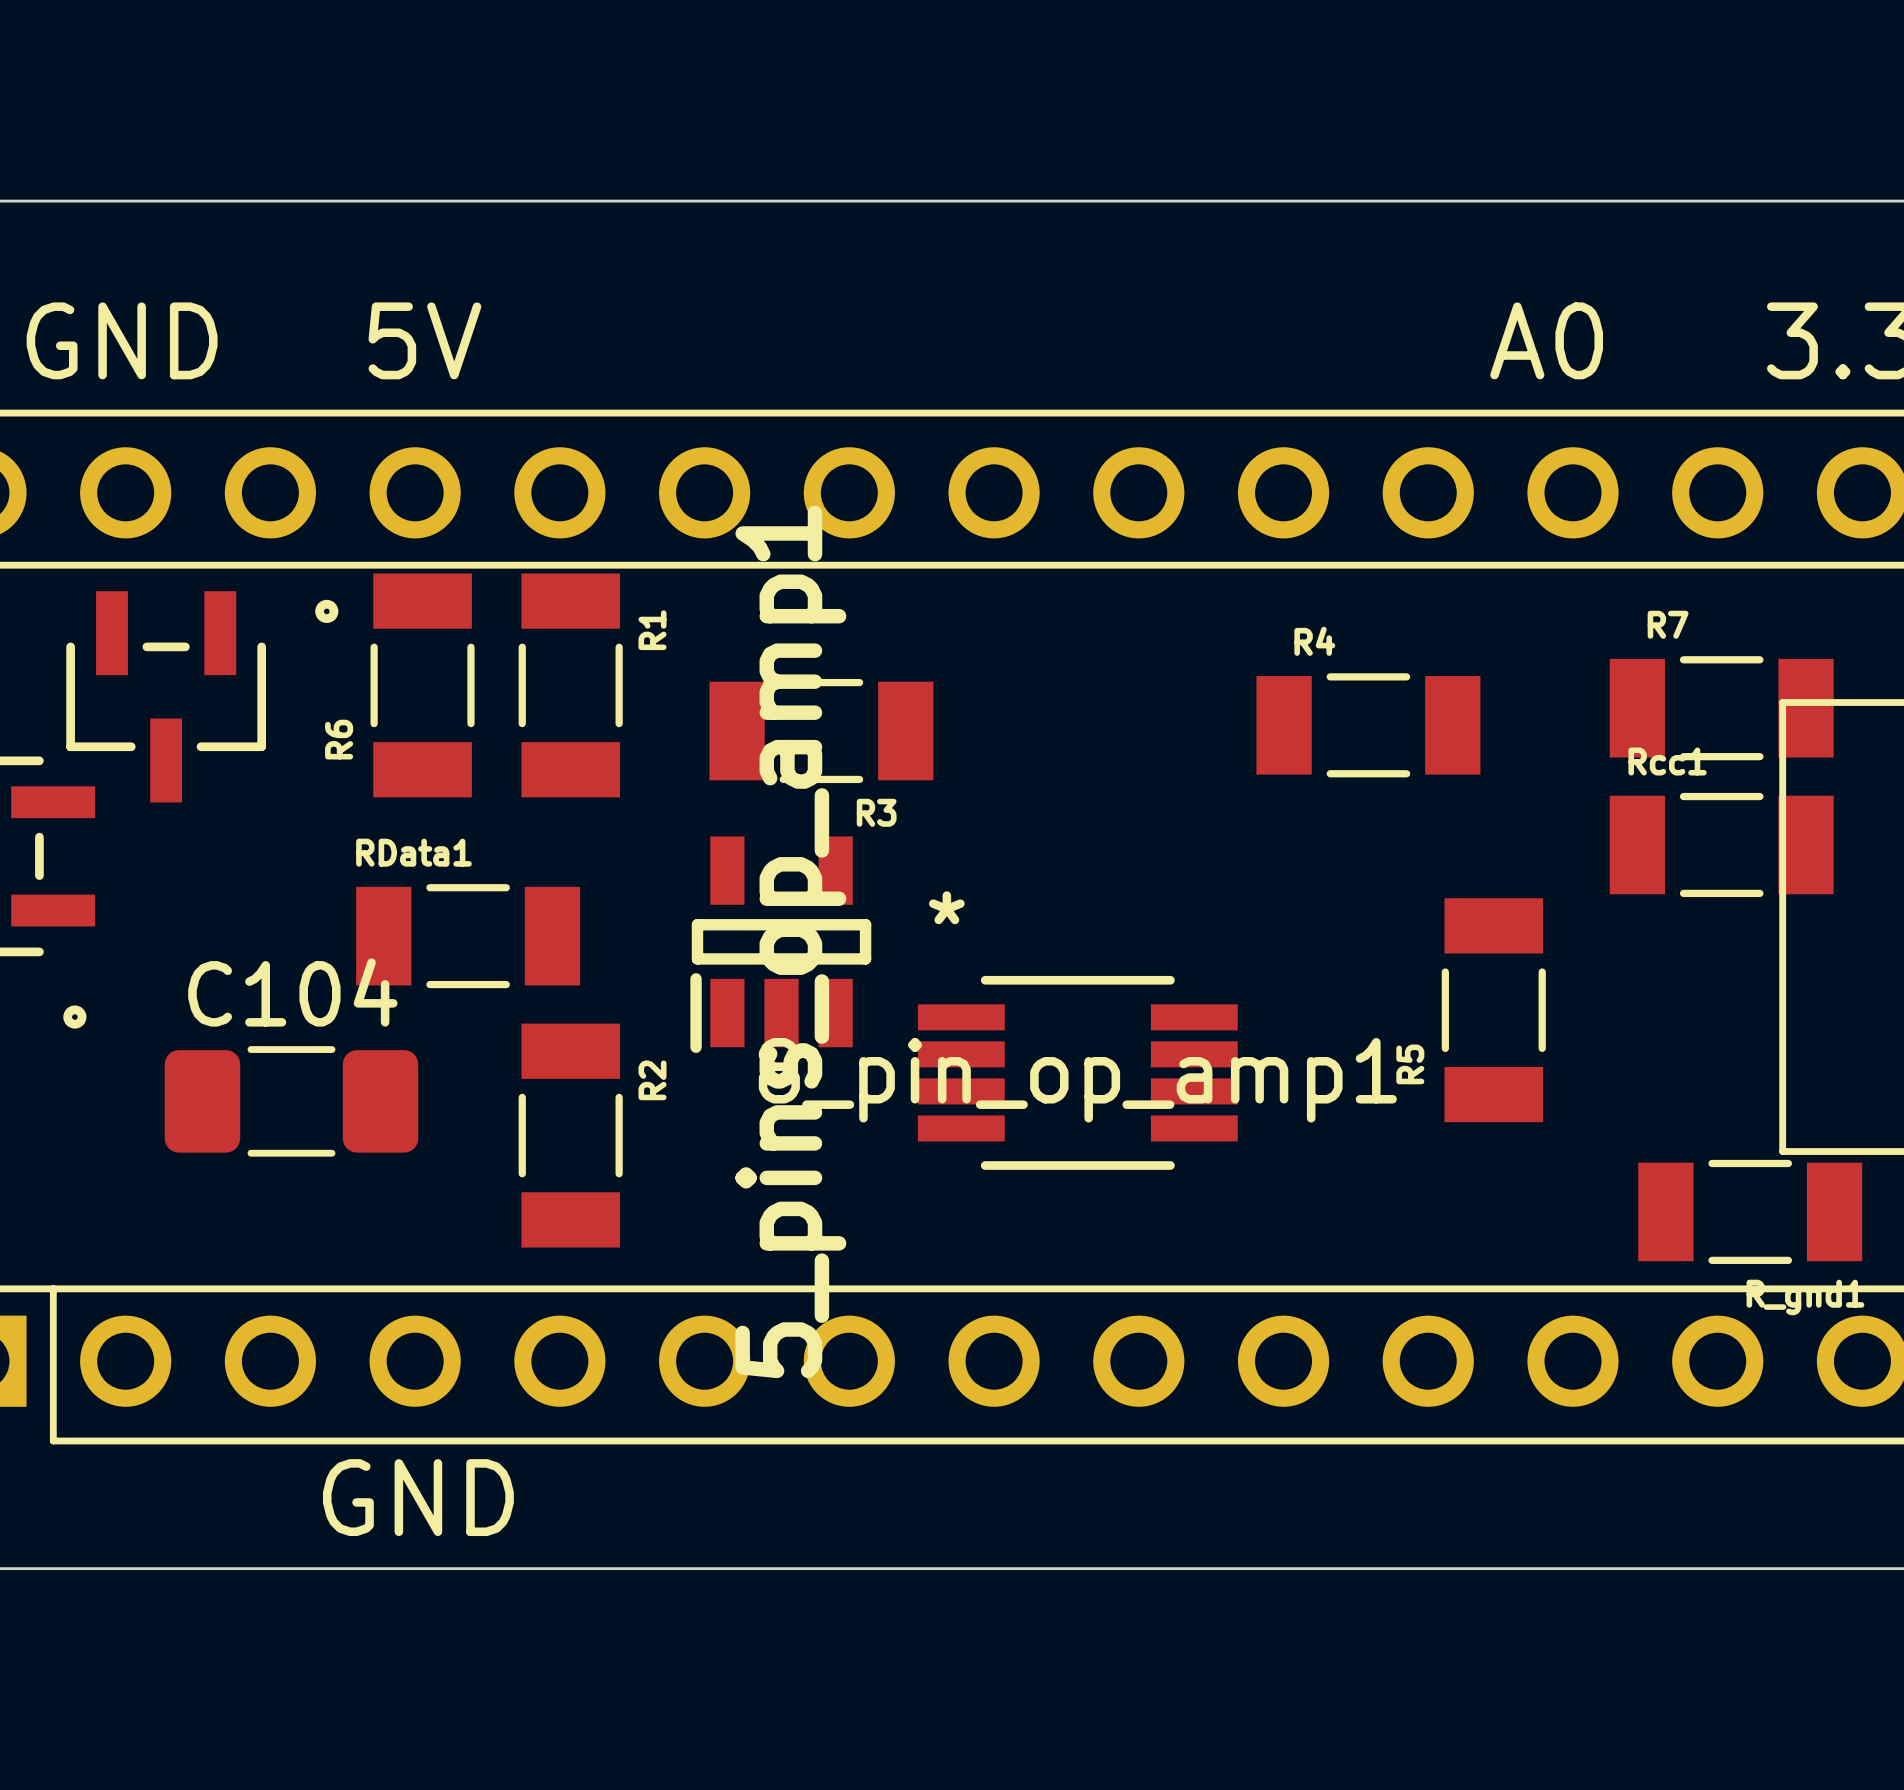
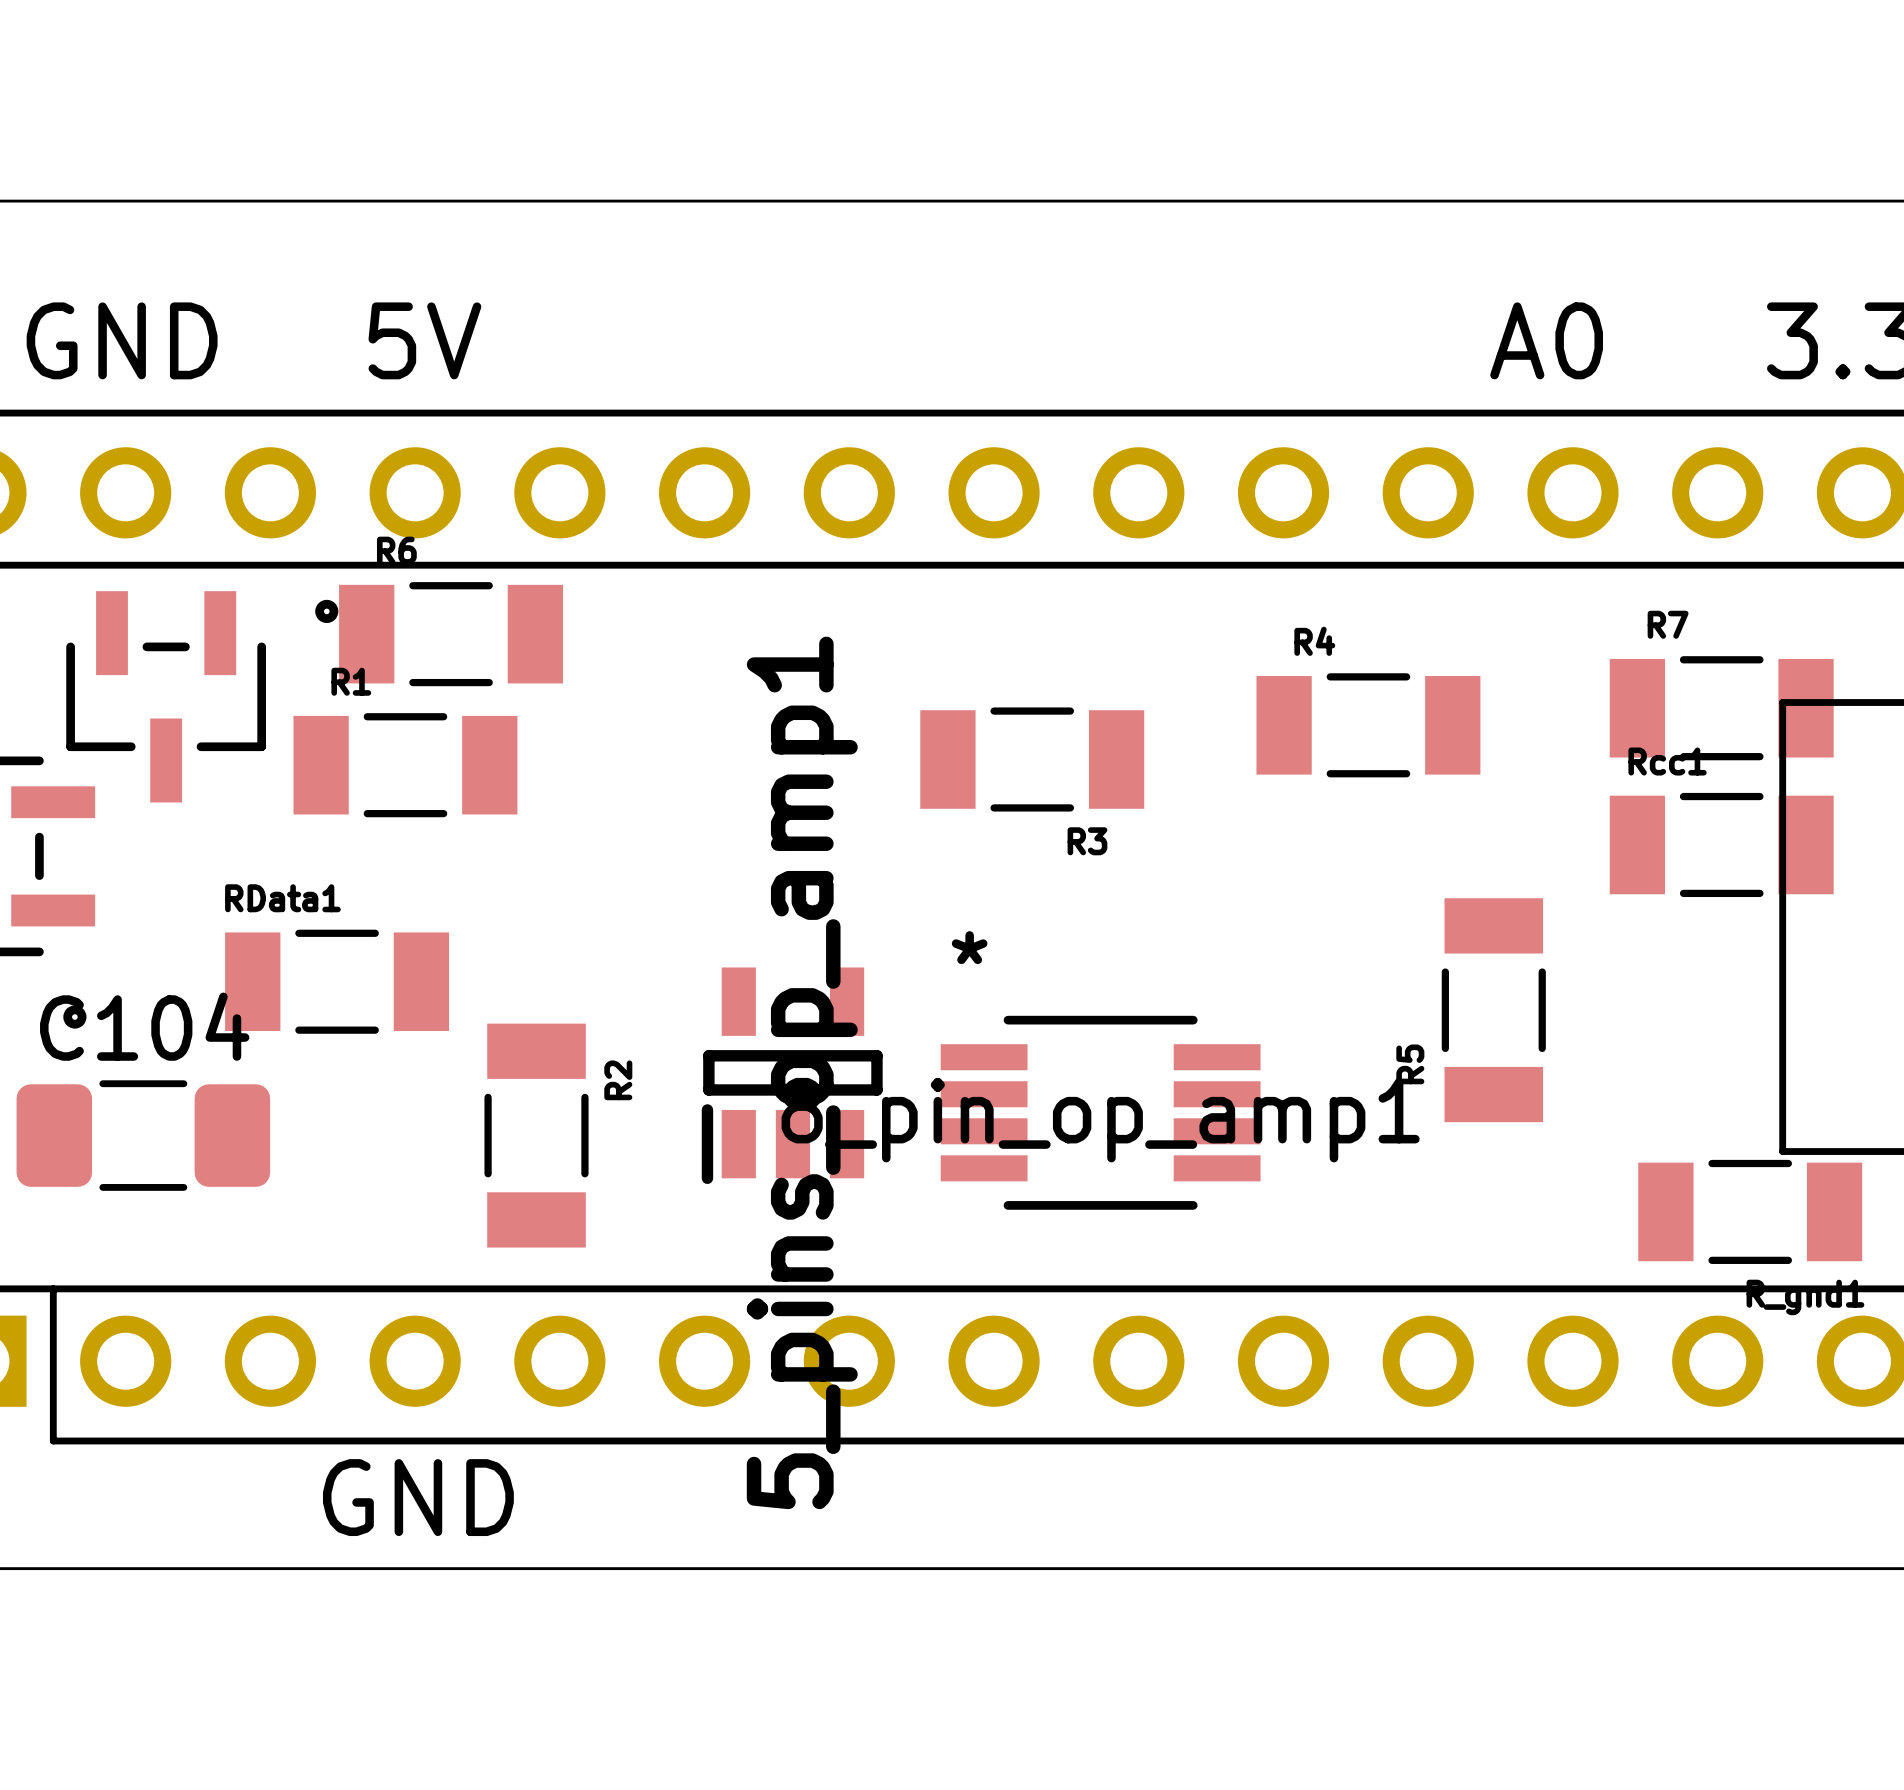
R1 name position: R1 (652, 630) -> R1 (351, 681)
R6 rotation: 0° (422, 685) -> 90° clockwise (451, 634)
R1 rotation: 0° (570, 685) -> 90° clockwise (405, 765)
R1 position: (570, 685) -> (405, 765)
R3 position: (821, 731) -> (1032, 759)
RData1 position: (468, 936) -> (337, 981)
5_pins_op_amp1 position: (780, 944) -> (792, 1075)
8_pin_op_amp1 position: (1077, 1072) -> (1100, 1112)
C104 position: (291, 1101) -> (143, 1135)
R2 position: (570, 1135) -> (536, 1135)

